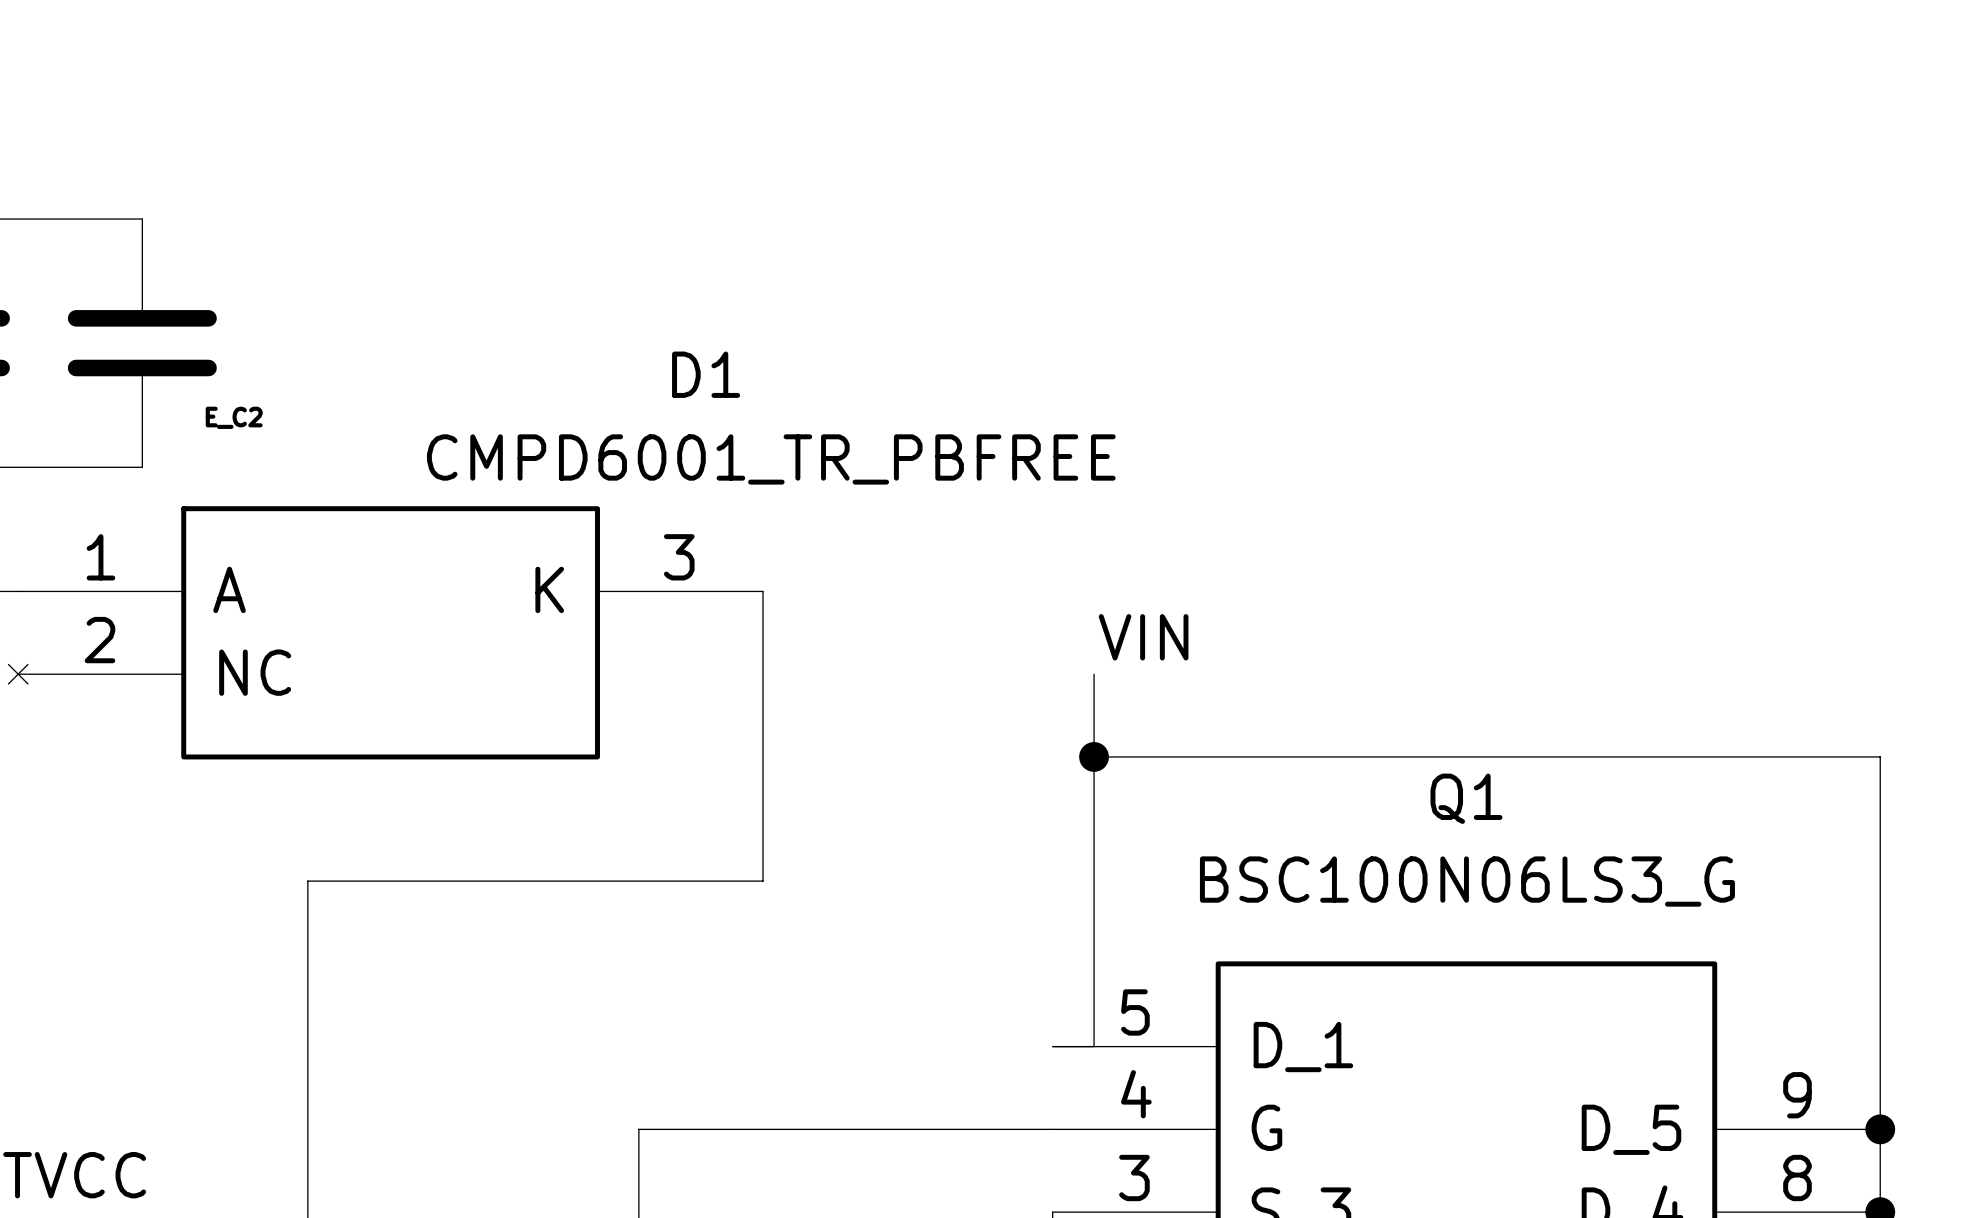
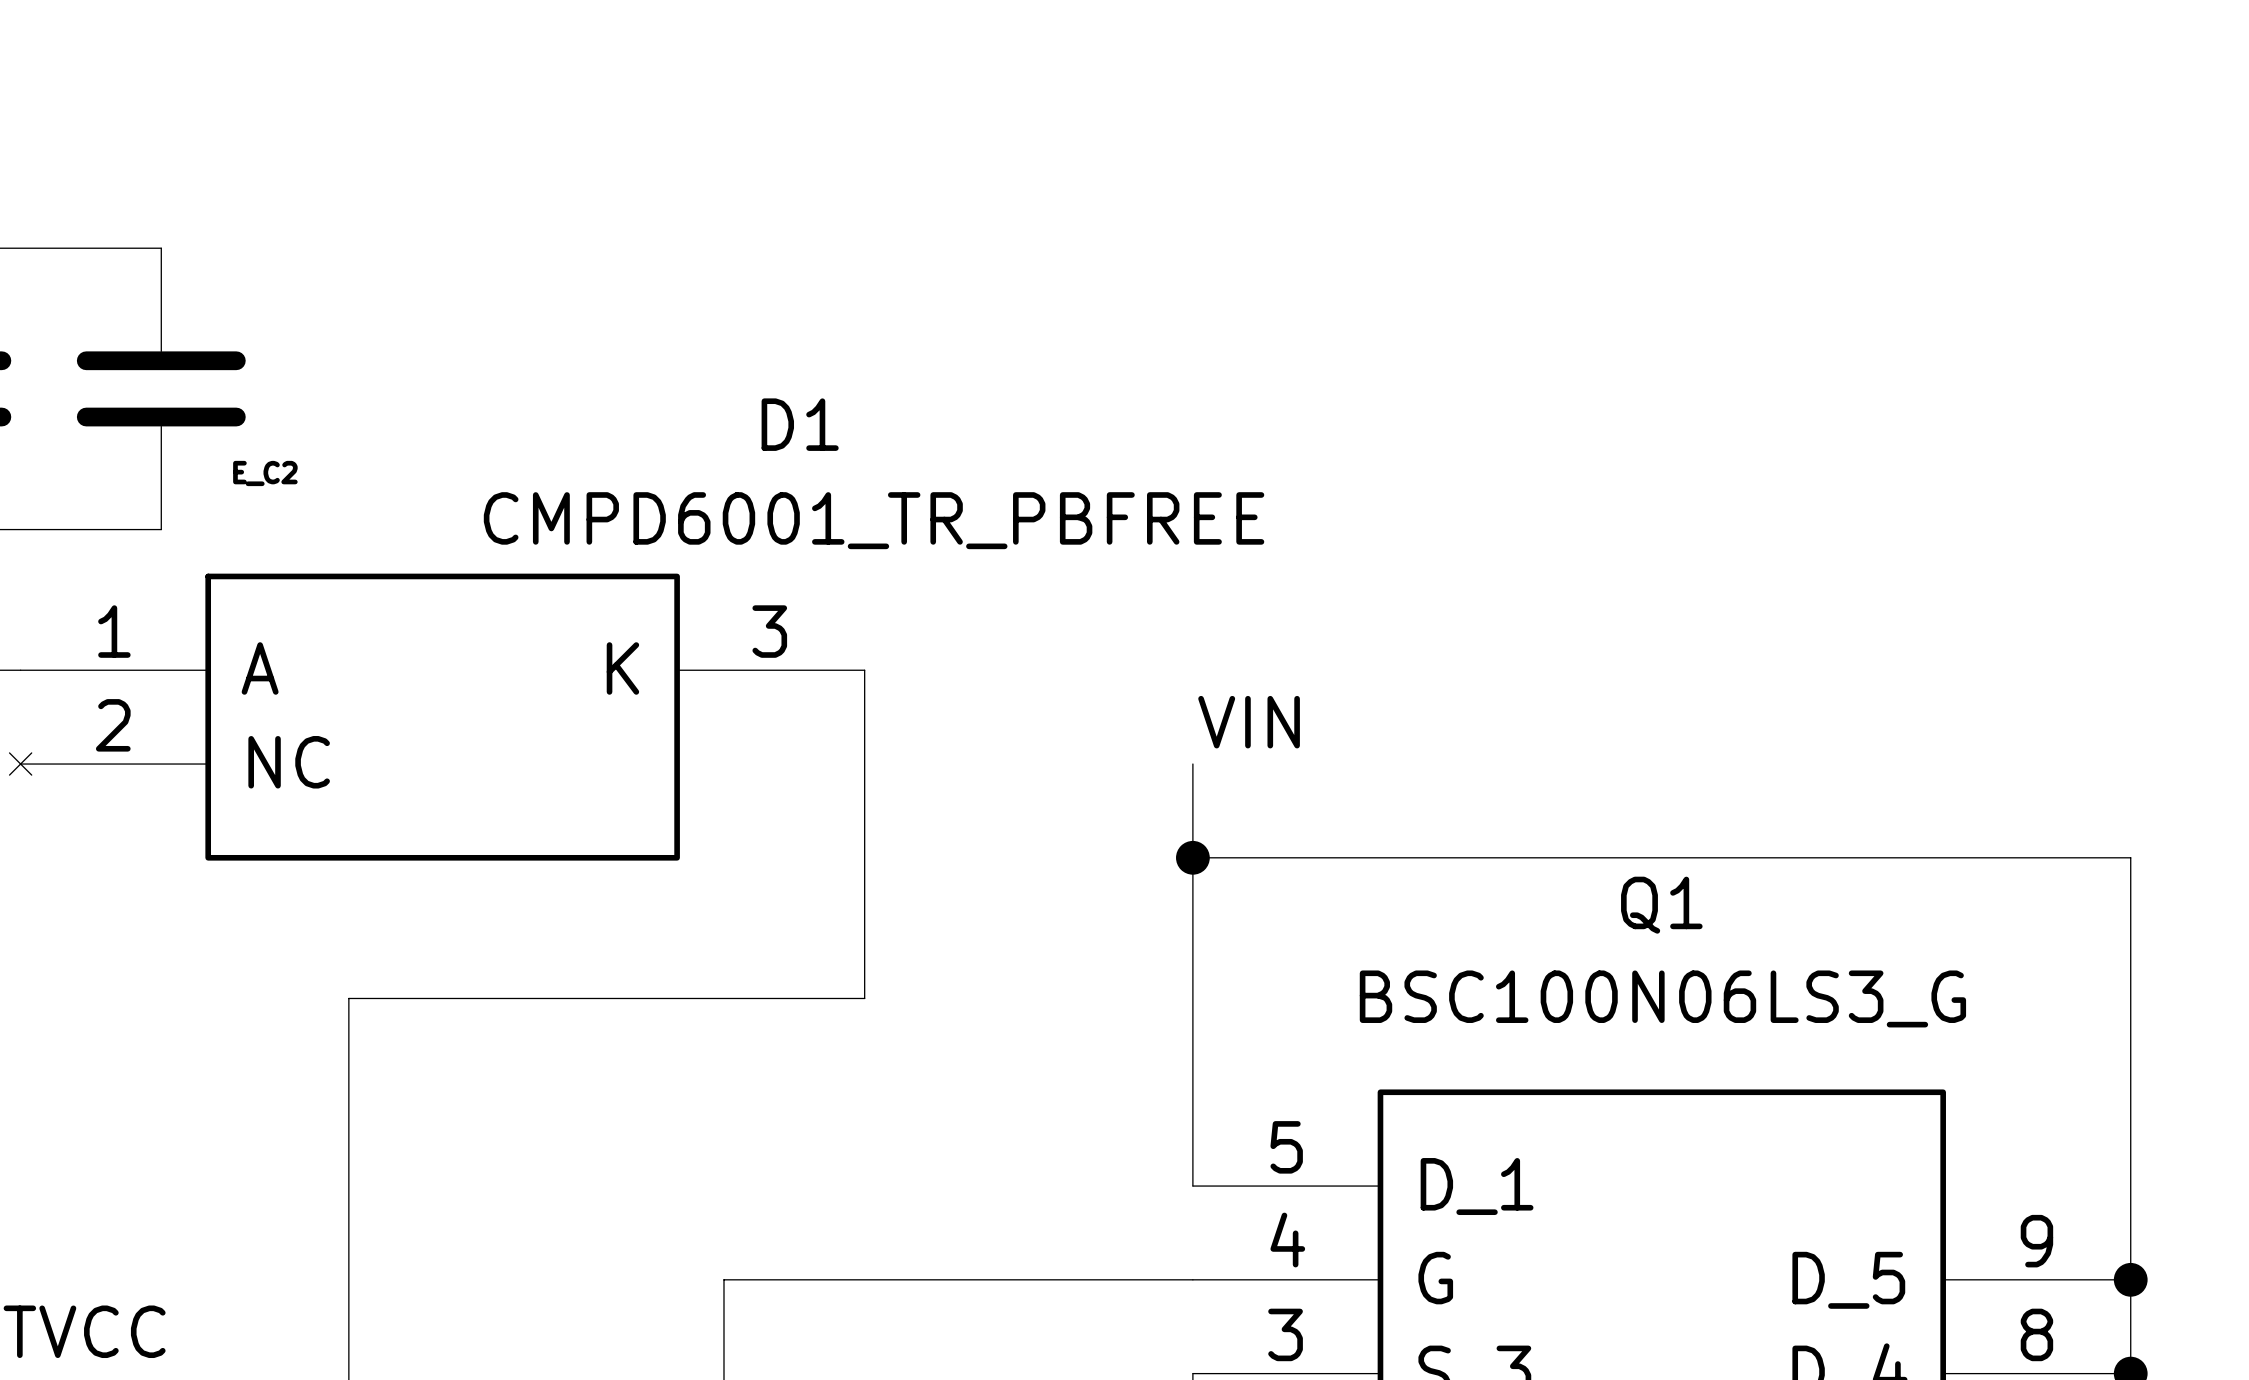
label position: VIN (1143, 637) -> VIN (1249, 722)
wire: (1094, 674) (1094, 1046) (1052, 1046) -> (1192, 764) (1192, 1186)
wire: none -> (1192, 857) (1239, 857)
junction position: (1094, 756) -> (1192, 857)

